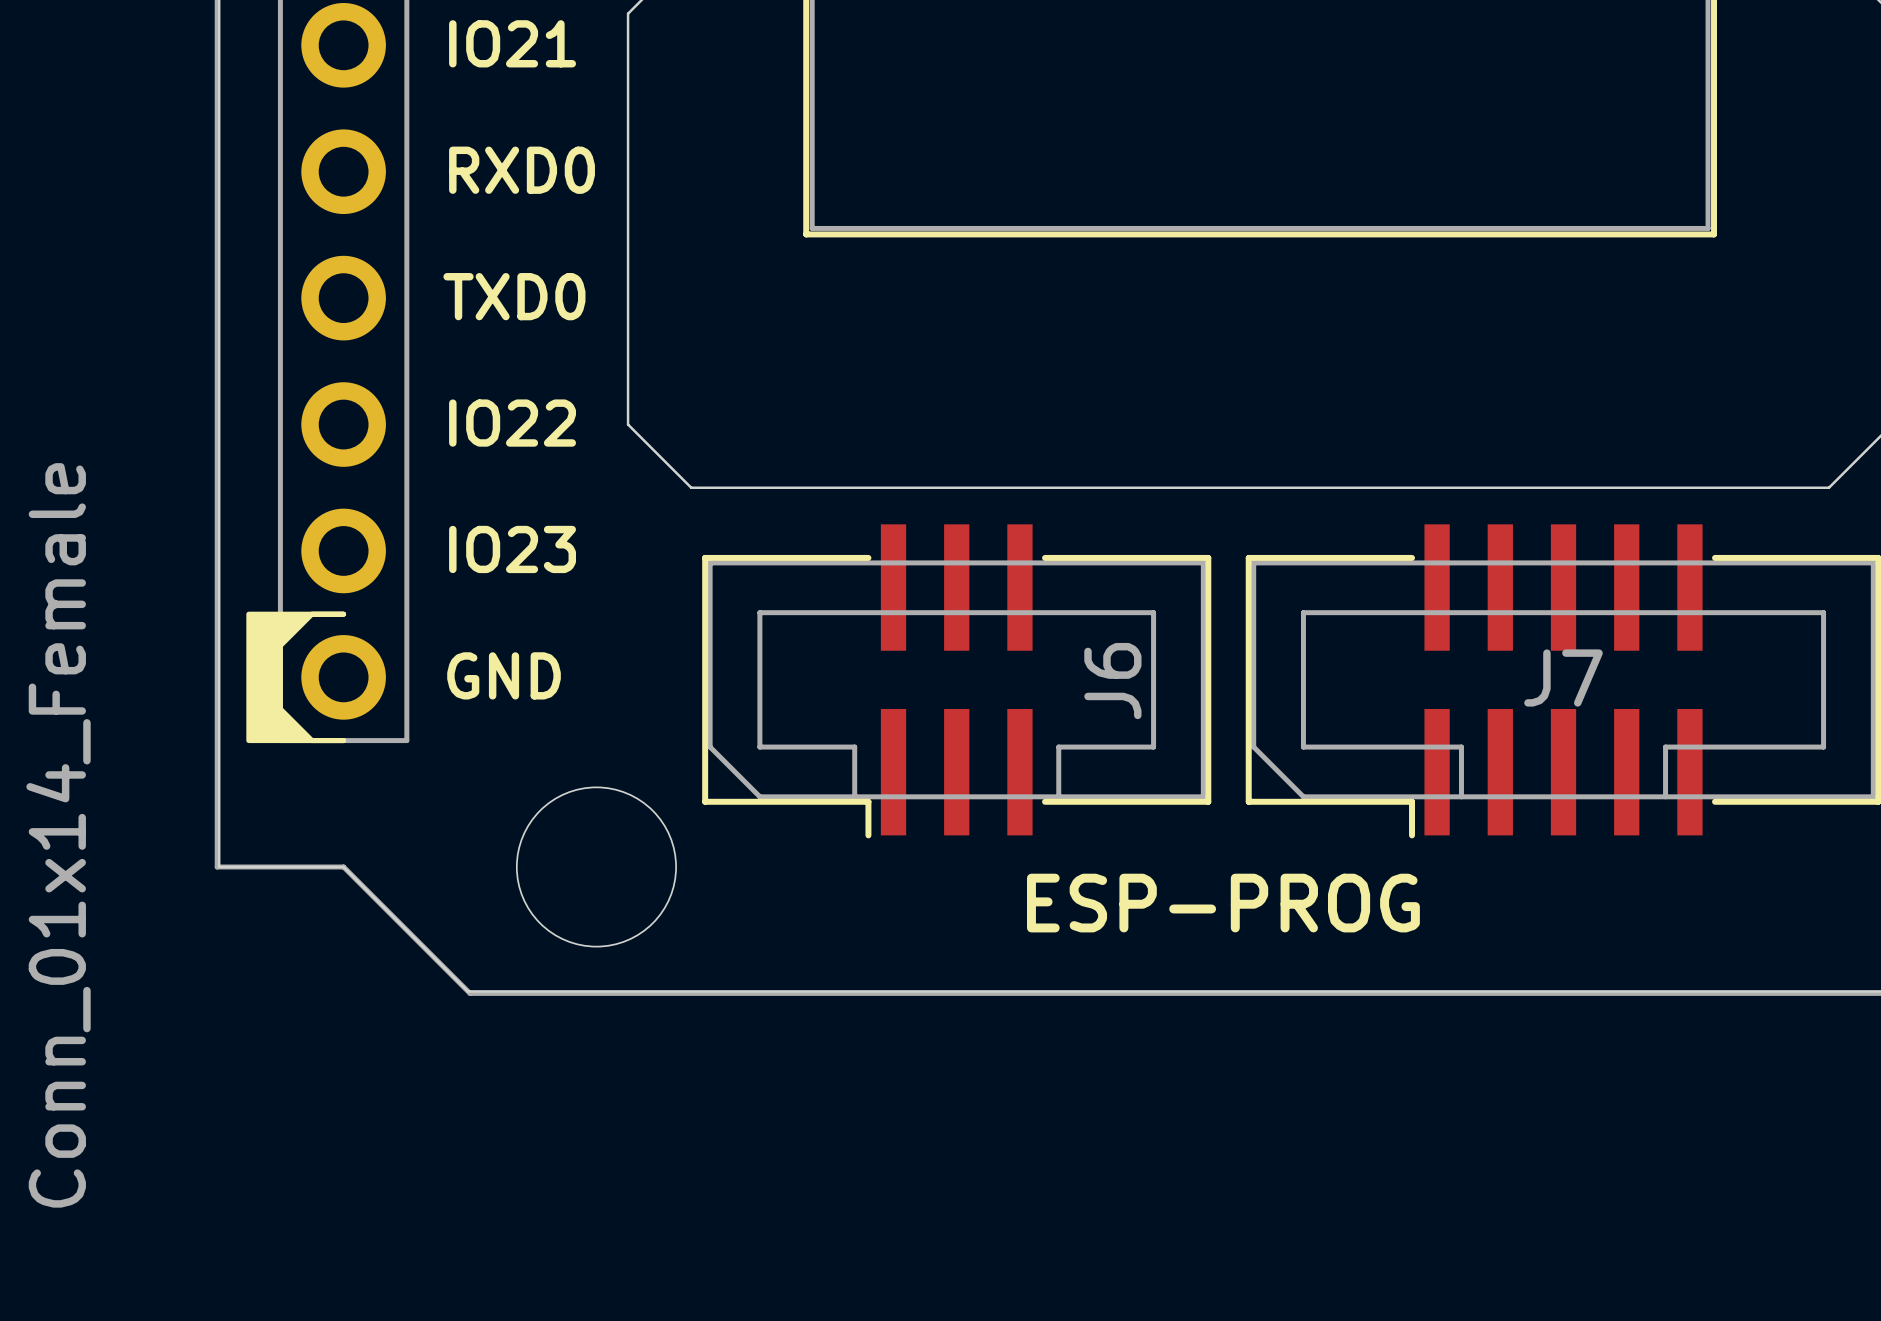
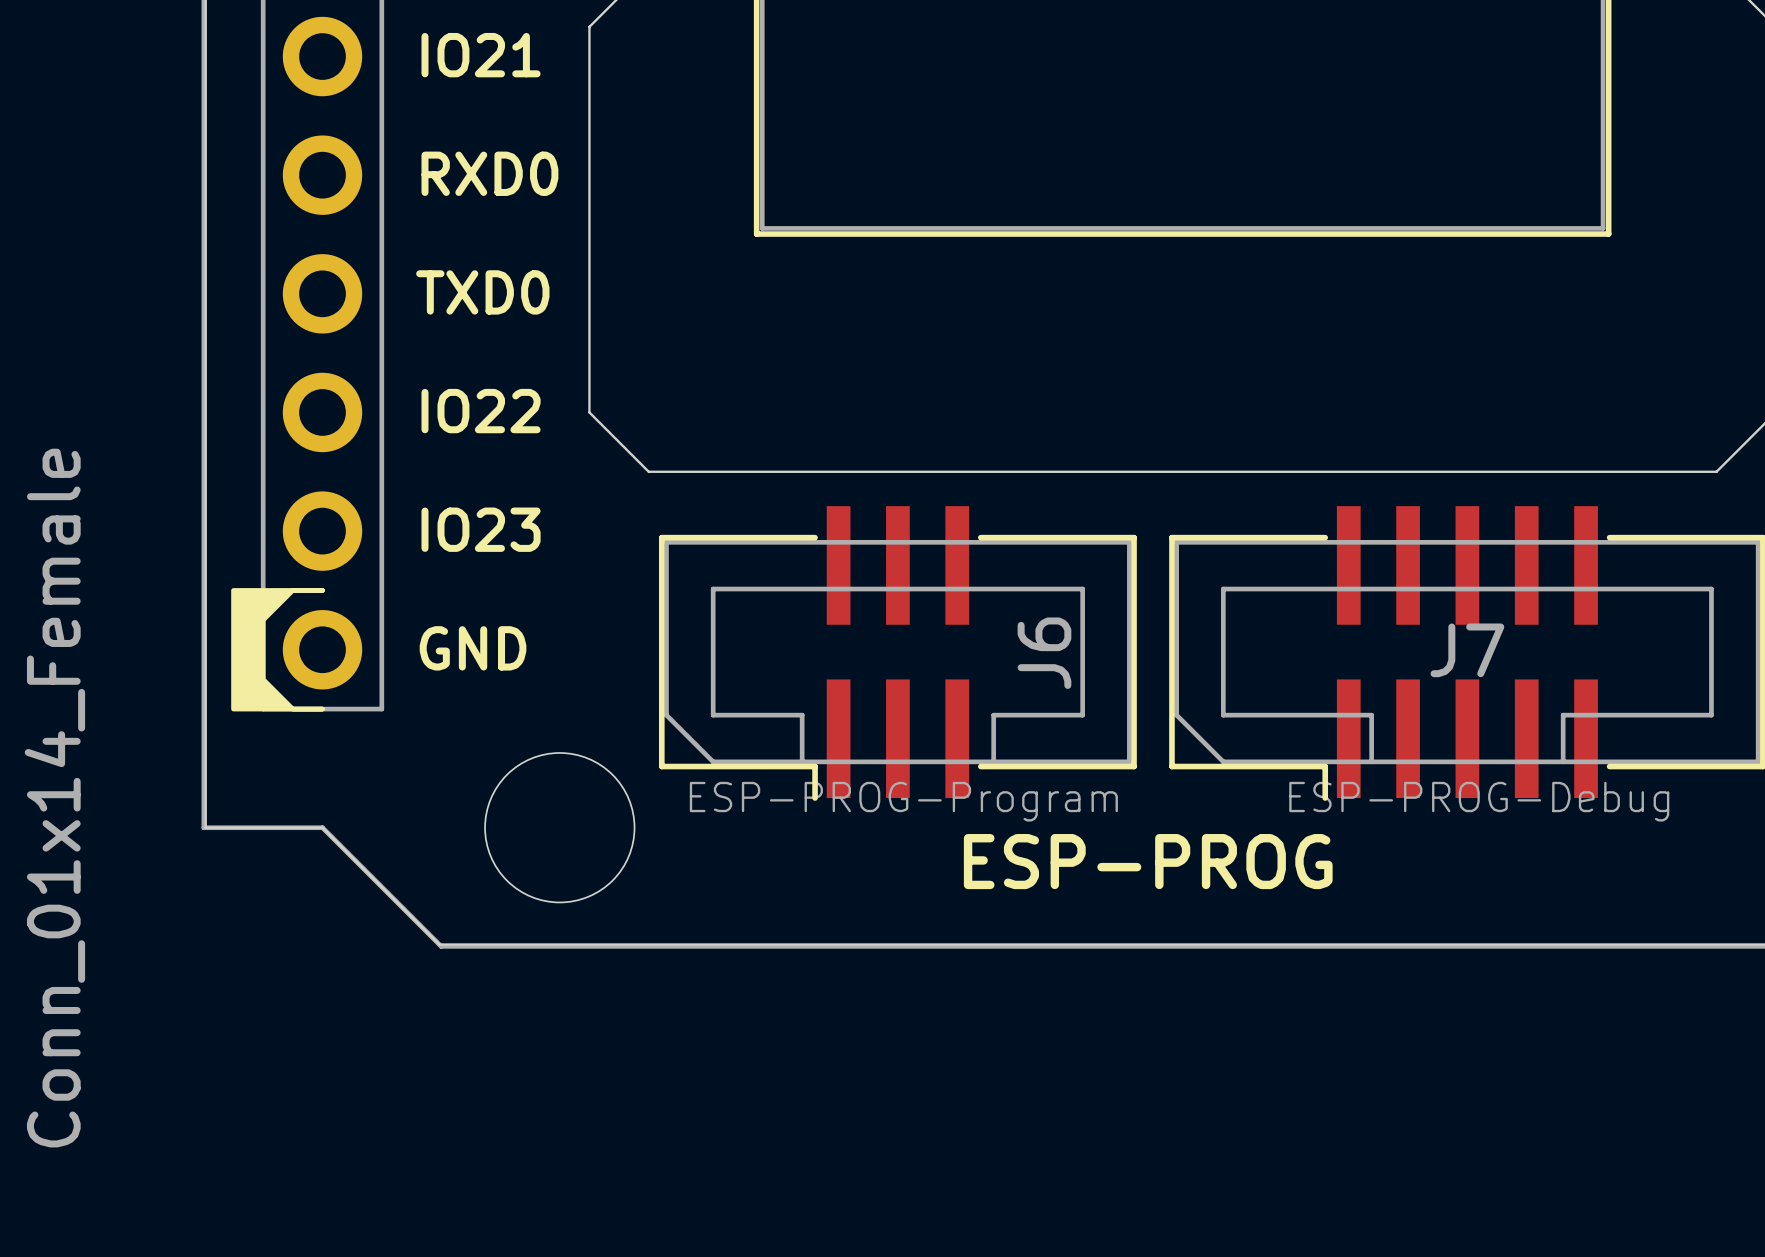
J6 value: none -> ESP-PROG-Program (903, 801)
J7 value: none -> ESP-PROG-Debug (1479, 801)

